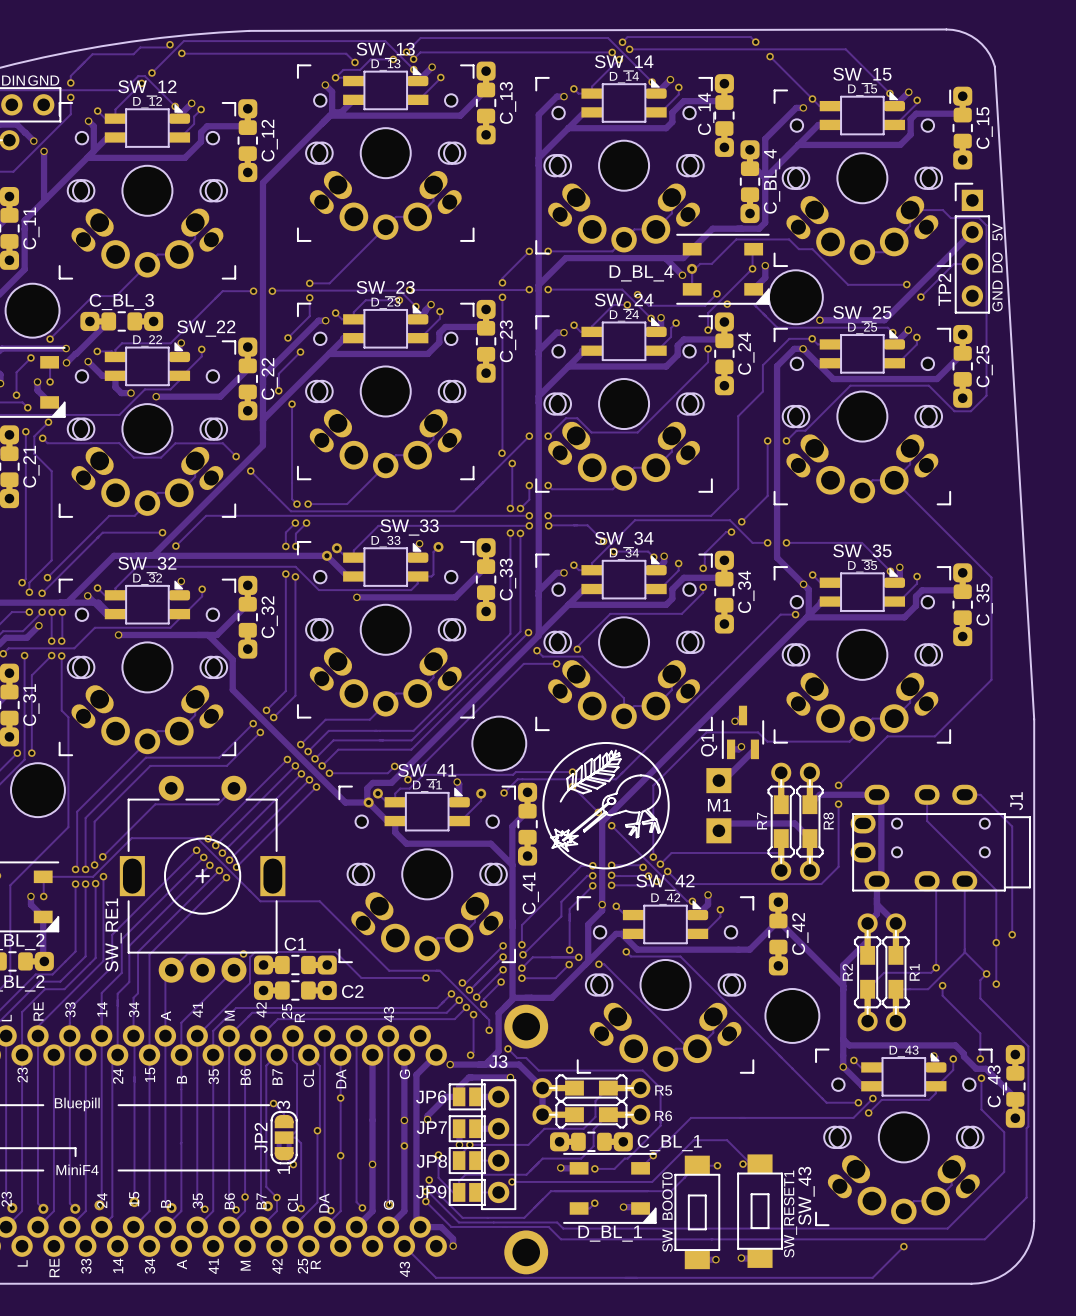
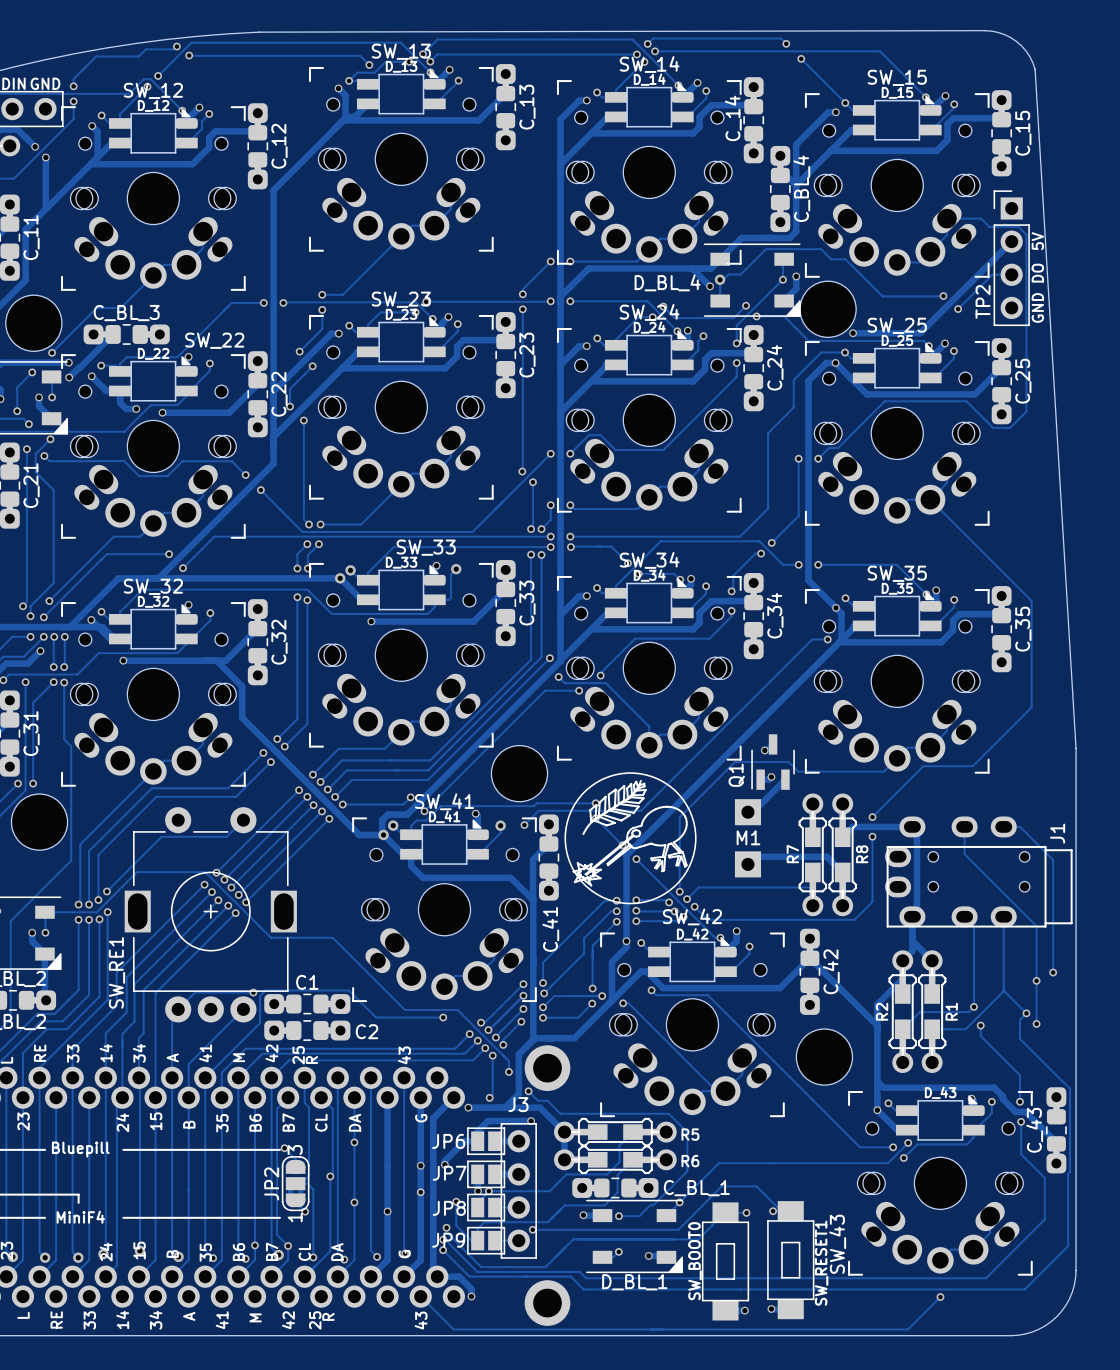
SW_14 footprint: [535, 76, 713, 255] -> [556, 80, 742, 265]
SW_15 footprint: [773, 89, 952, 267] -> [804, 93, 990, 278]
SW_22 footprint: [58, 340, 237, 518] -> [61, 354, 246, 539]
SW_43 footprint: [815, 1048, 993, 1227] -> [848, 1091, 1033, 1276]

